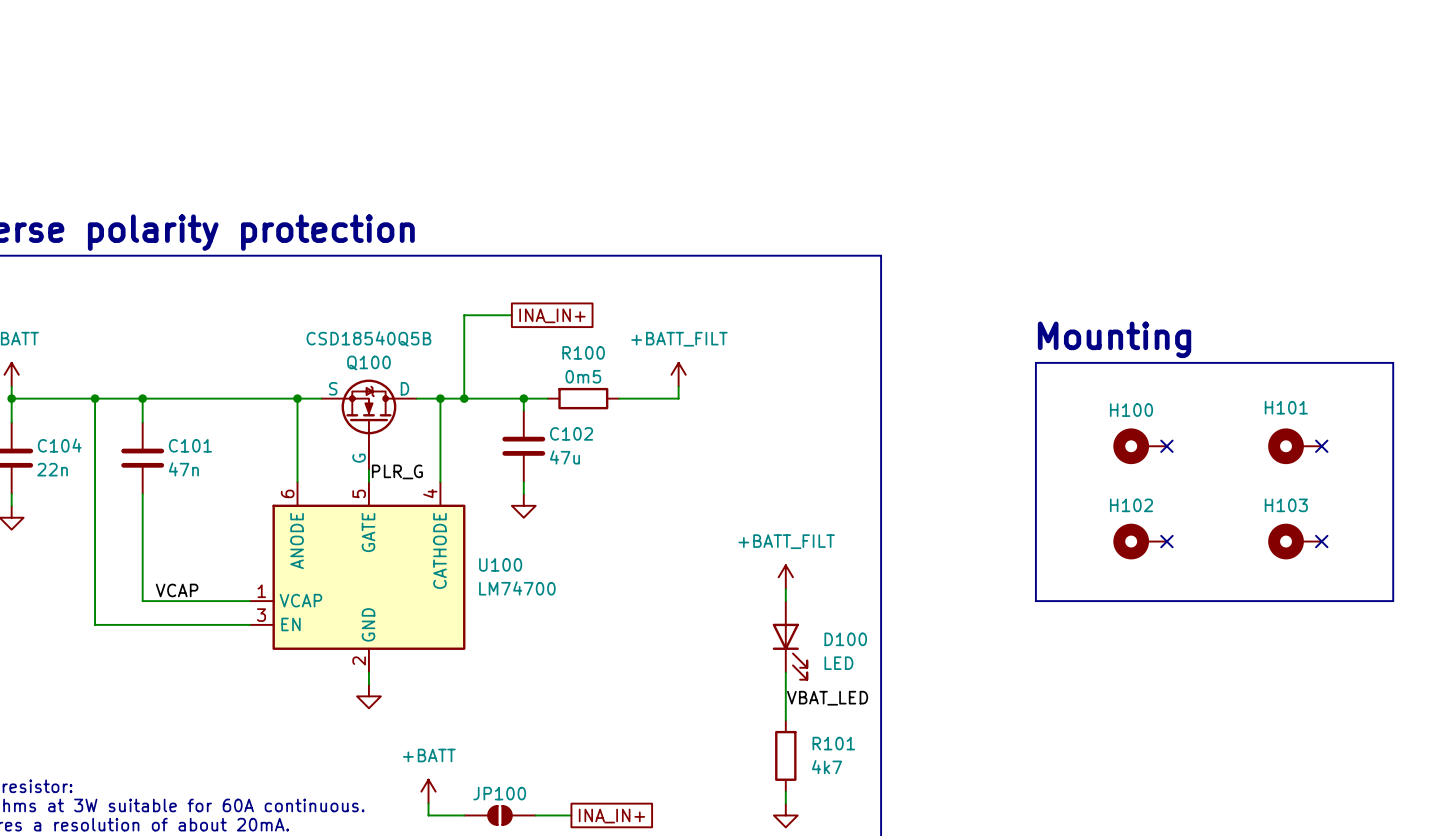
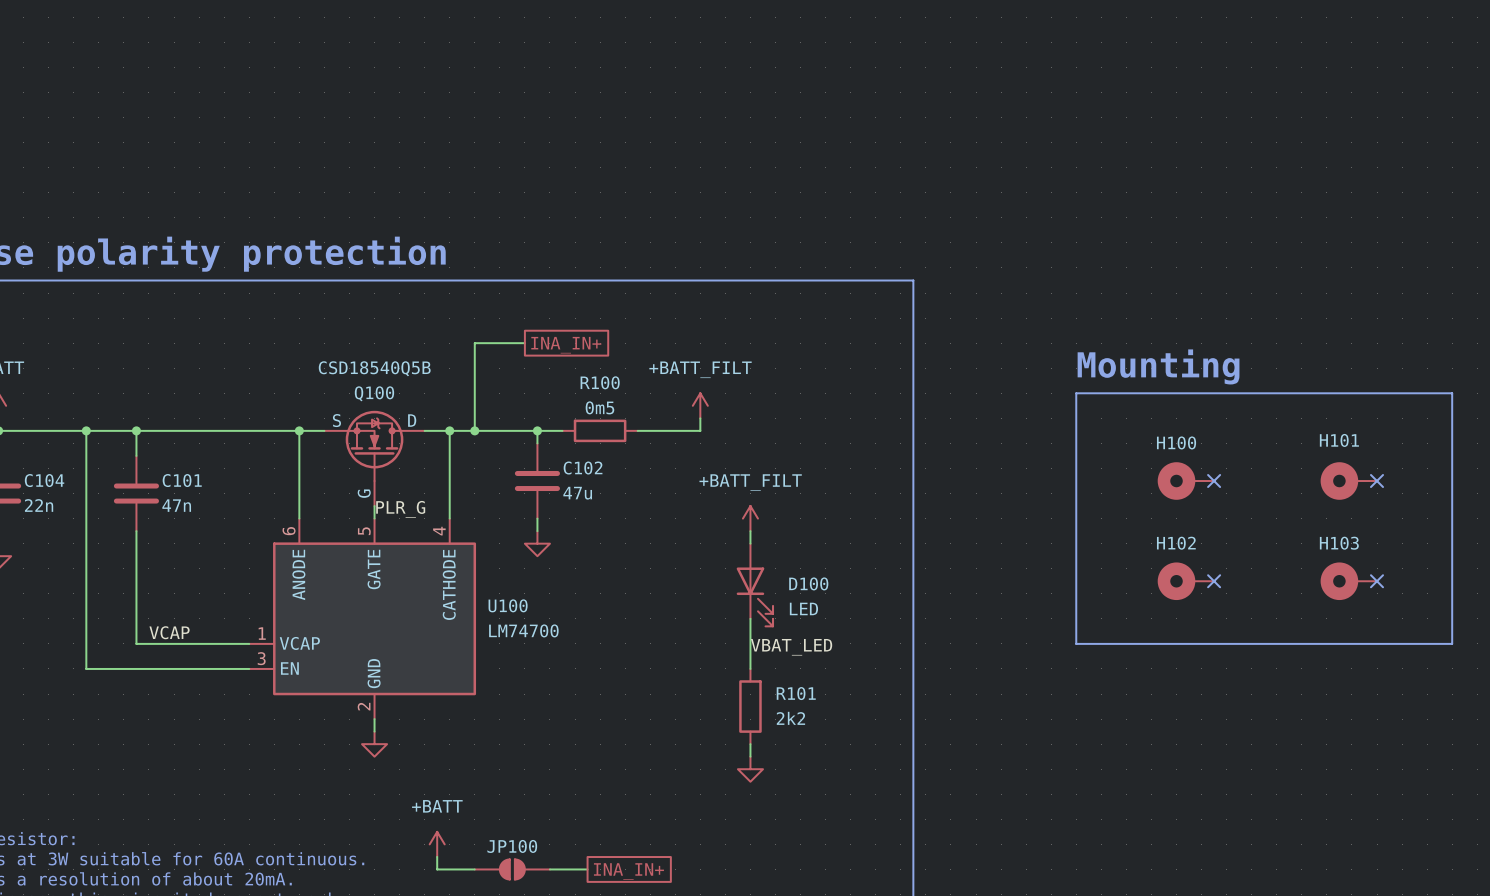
power symbol position: +BATT_FILT (785, 577) -> +BATT_FILT (750, 518)
wire: (785, 589) (785, 601) -> (750, 531) (750, 543)
D100 position: (789, 640) -> (754, 585)
wire: (785, 672) (785, 720) -> (750, 618) (750, 668)
label position: VBAT_LED (827, 698) -> VBAT_LED (791, 647)
R101 position: (785, 755) -> (750, 706)
R101 value: 4k7 (827, 767) -> 2k2 (790, 718)
wire: (785, 791) (785, 803) -> (750, 744) (750, 756)
power symbol position: (785, 815) -> (750, 769)

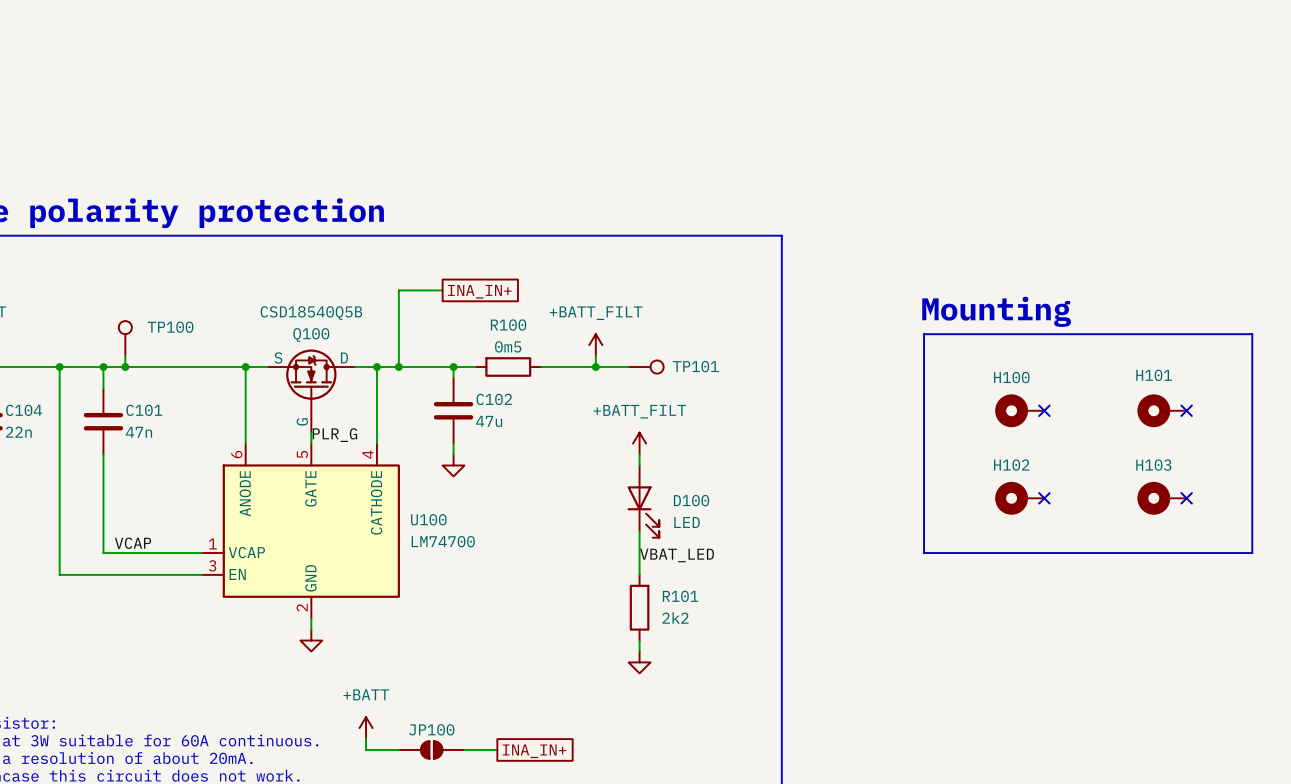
TP100: none -> (125, 338)
wire: none -> (125, 356) (125, 367)
junction: none -> (125, 367)
wire: none -> (595, 367) (628, 367)
junction: none -> (595, 367)
TP101: none -> (646, 367)

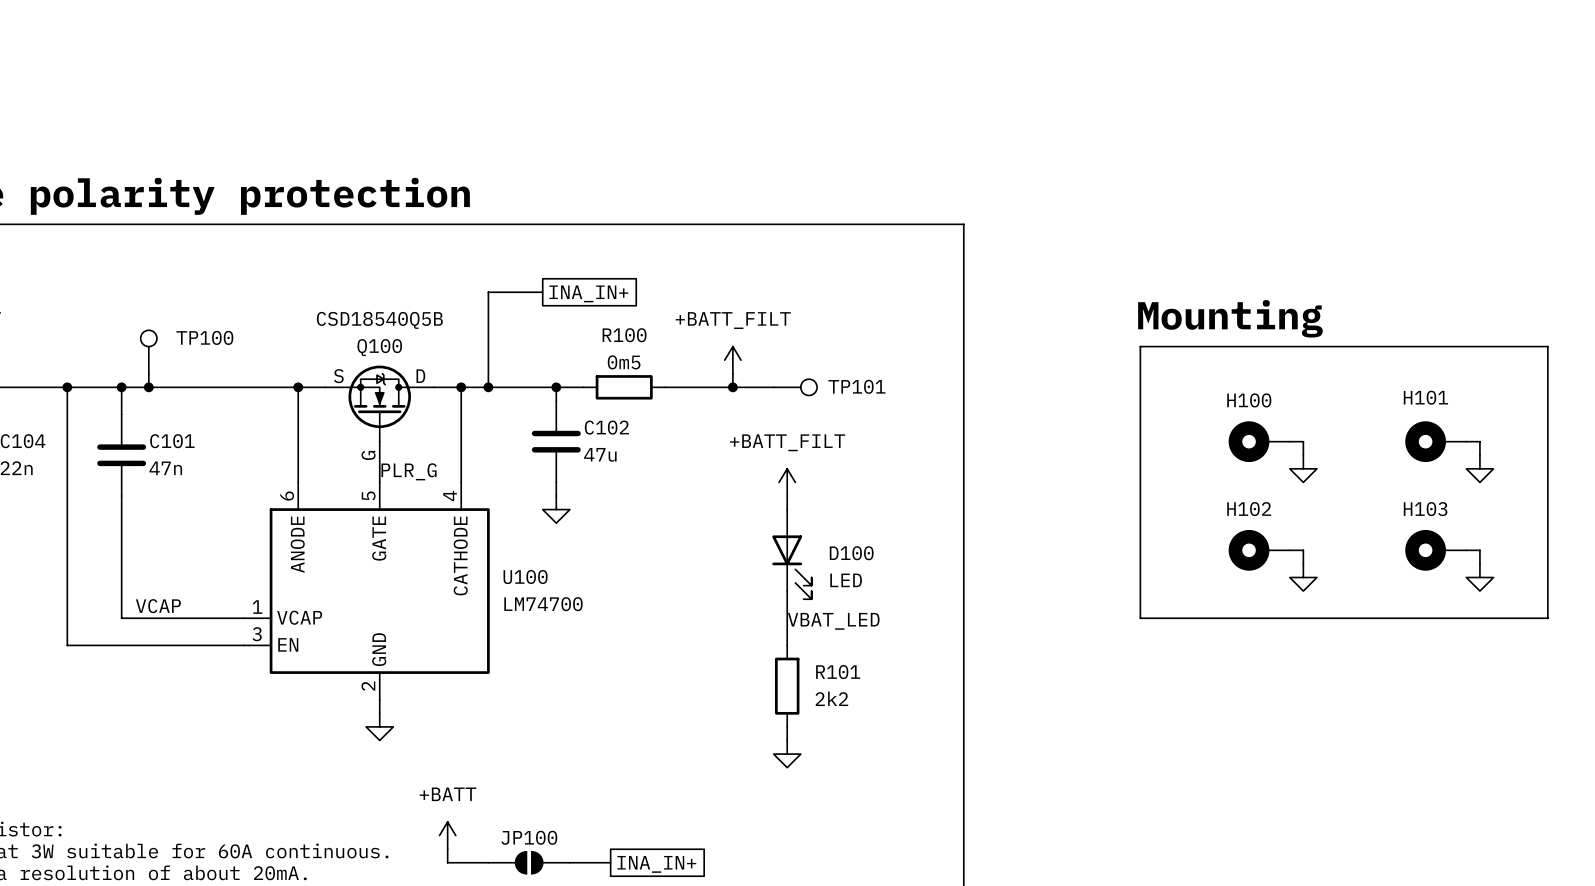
wire: none -> (1289, 441) (1303, 441) (1303, 455)
no-connect mark: (1044, 410) -> none
wire: none -> (1466, 441) (1479, 441) (1479, 455)
no-connect mark: (1186, 410) -> none
power symbol: none -> (1303, 468)
power symbol: none -> (1479, 468)
wire: none -> (1289, 550) (1303, 550) (1303, 563)
no-connect mark: (1044, 498) -> none
wire: none -> (1466, 550) (1479, 550) (1479, 563)
no-connect mark: (1186, 498) -> none
power symbol: none -> (1303, 577)
power symbol: none -> (1479, 577)

